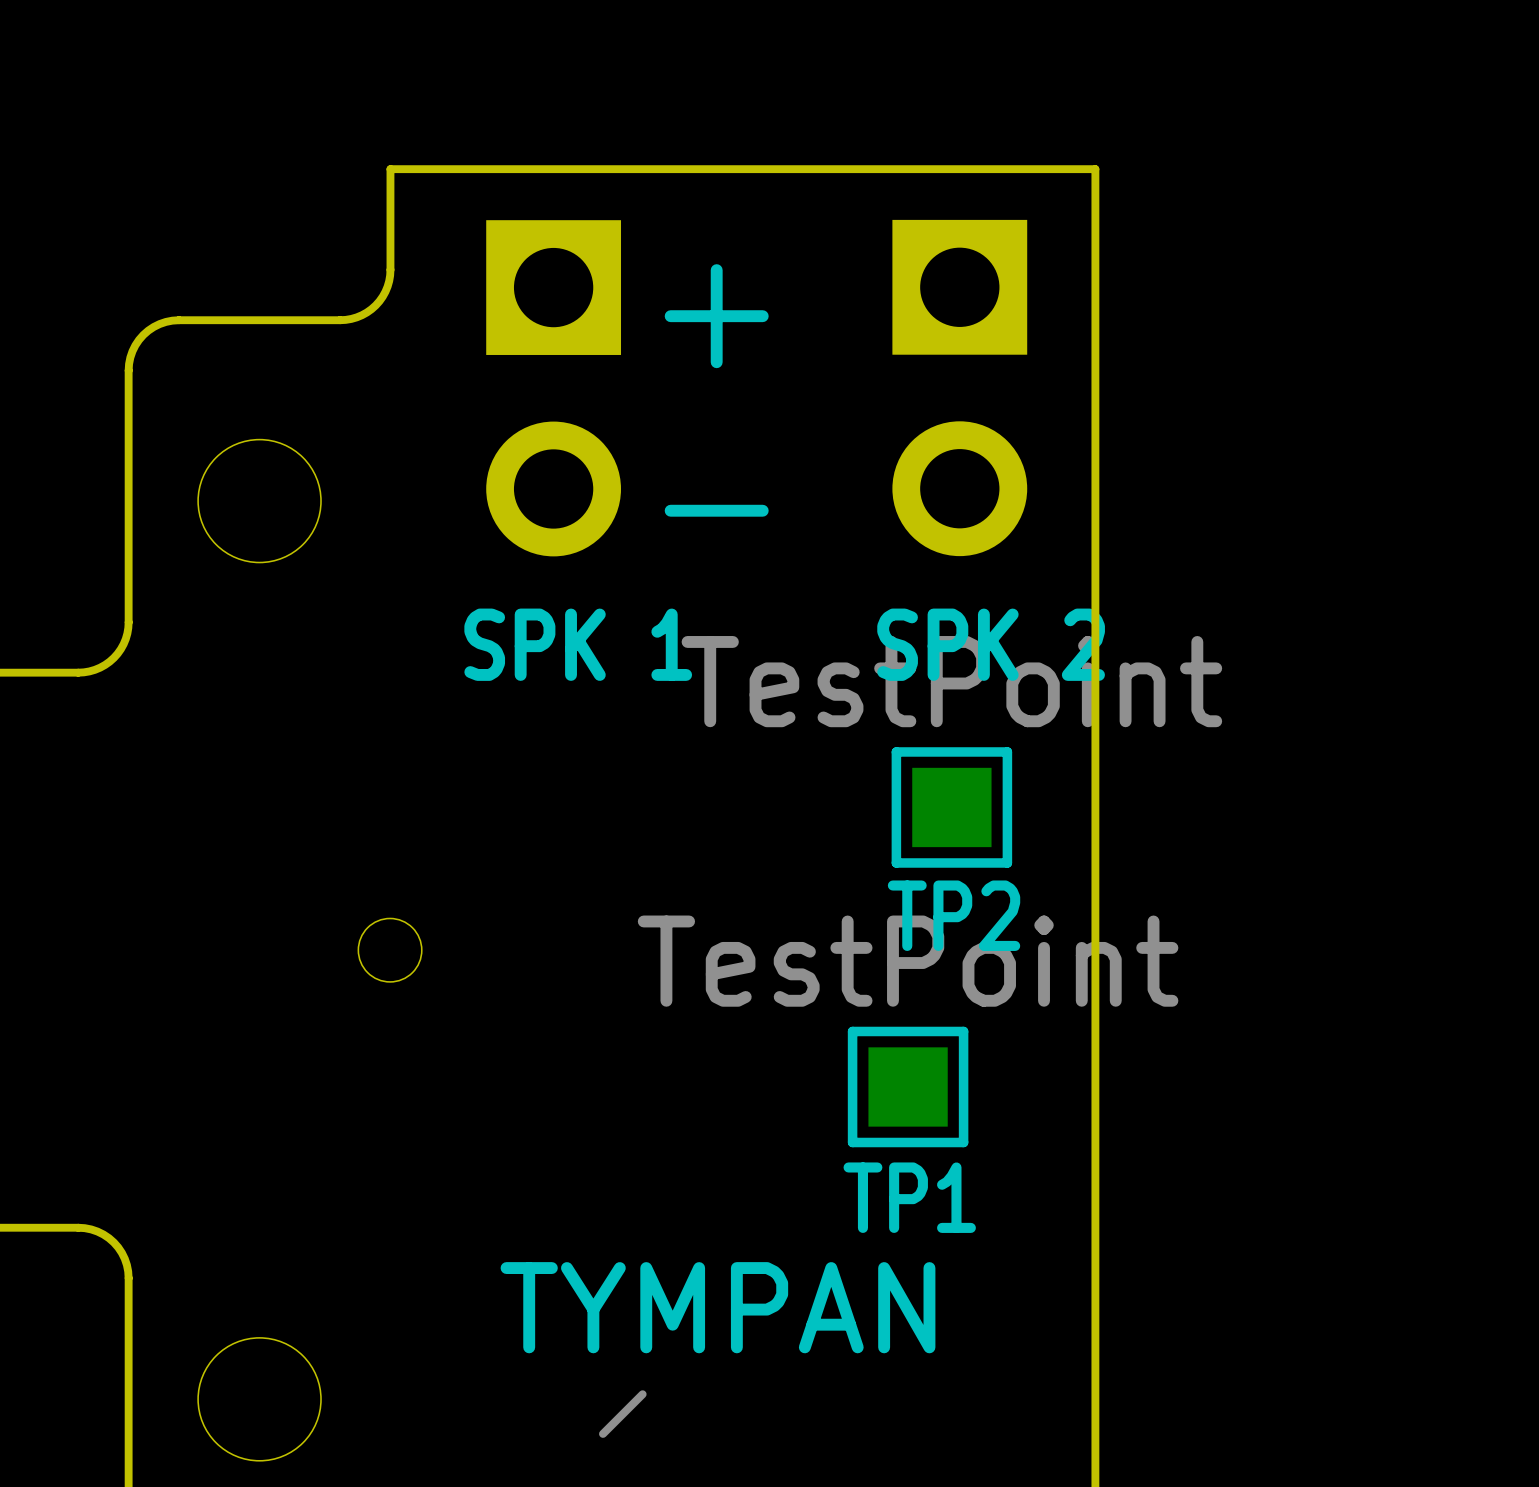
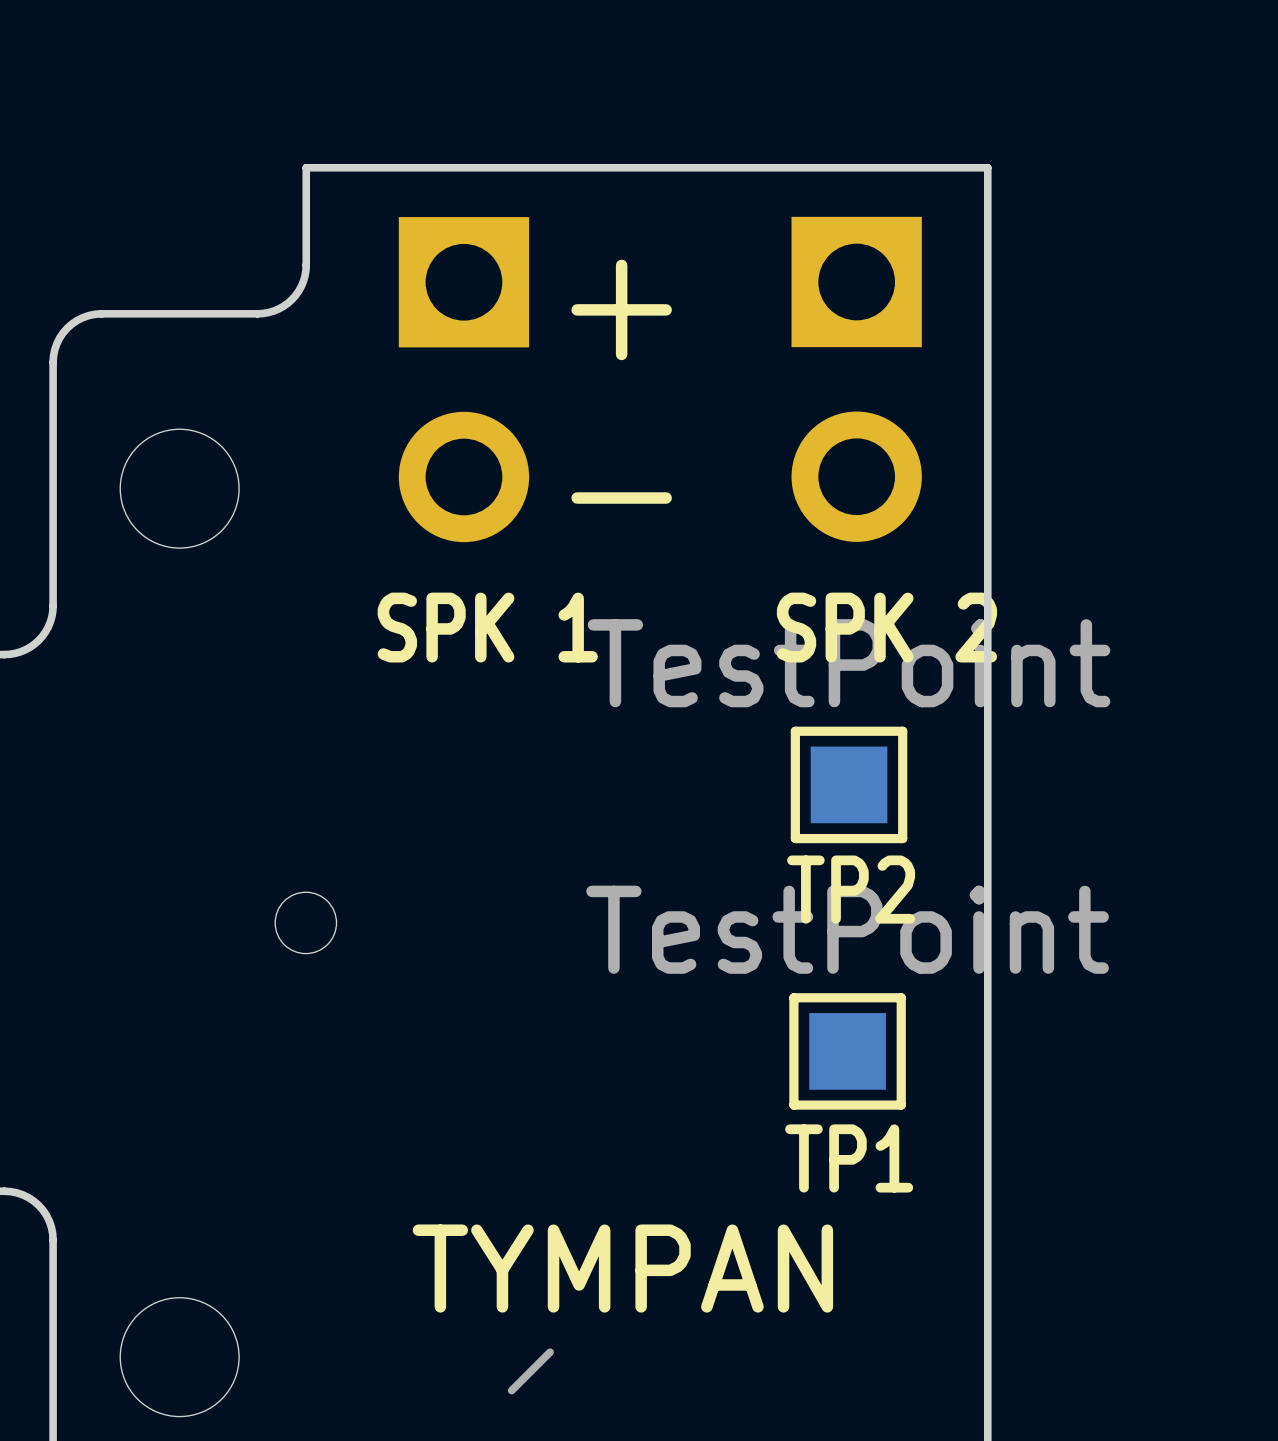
TP1 position: (908, 1086) -> (847, 1051)

